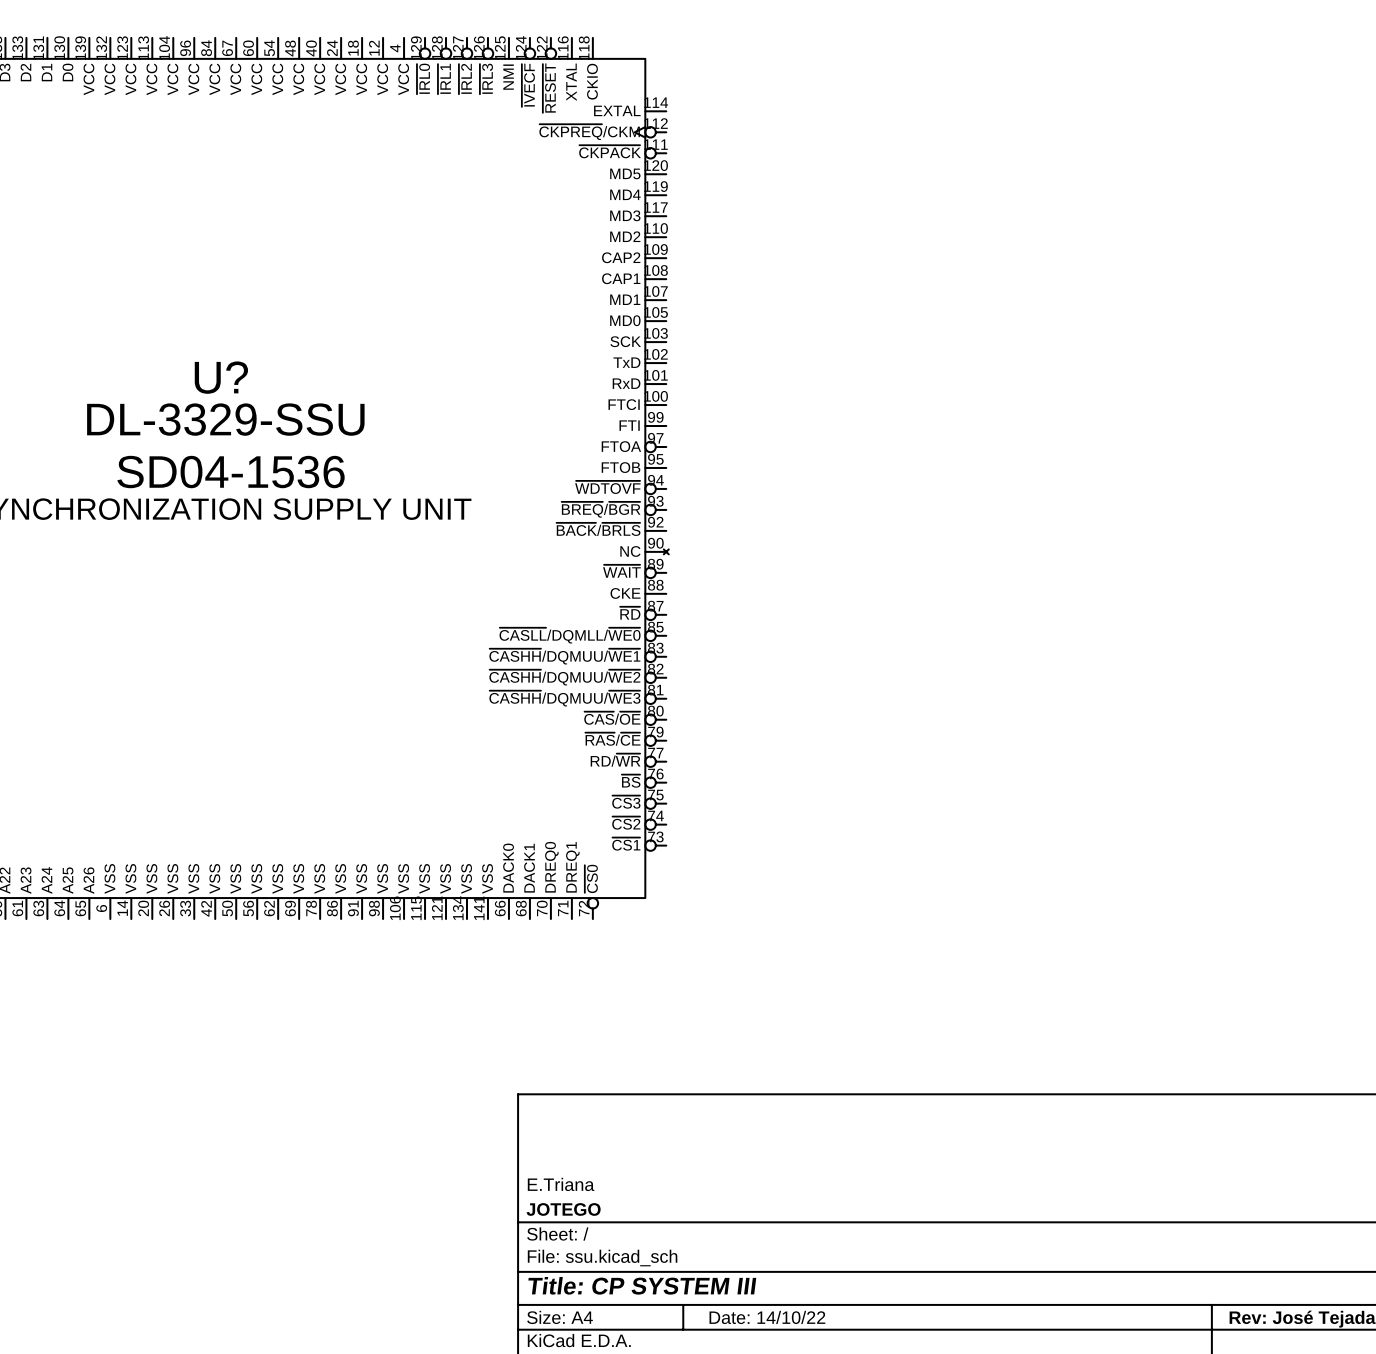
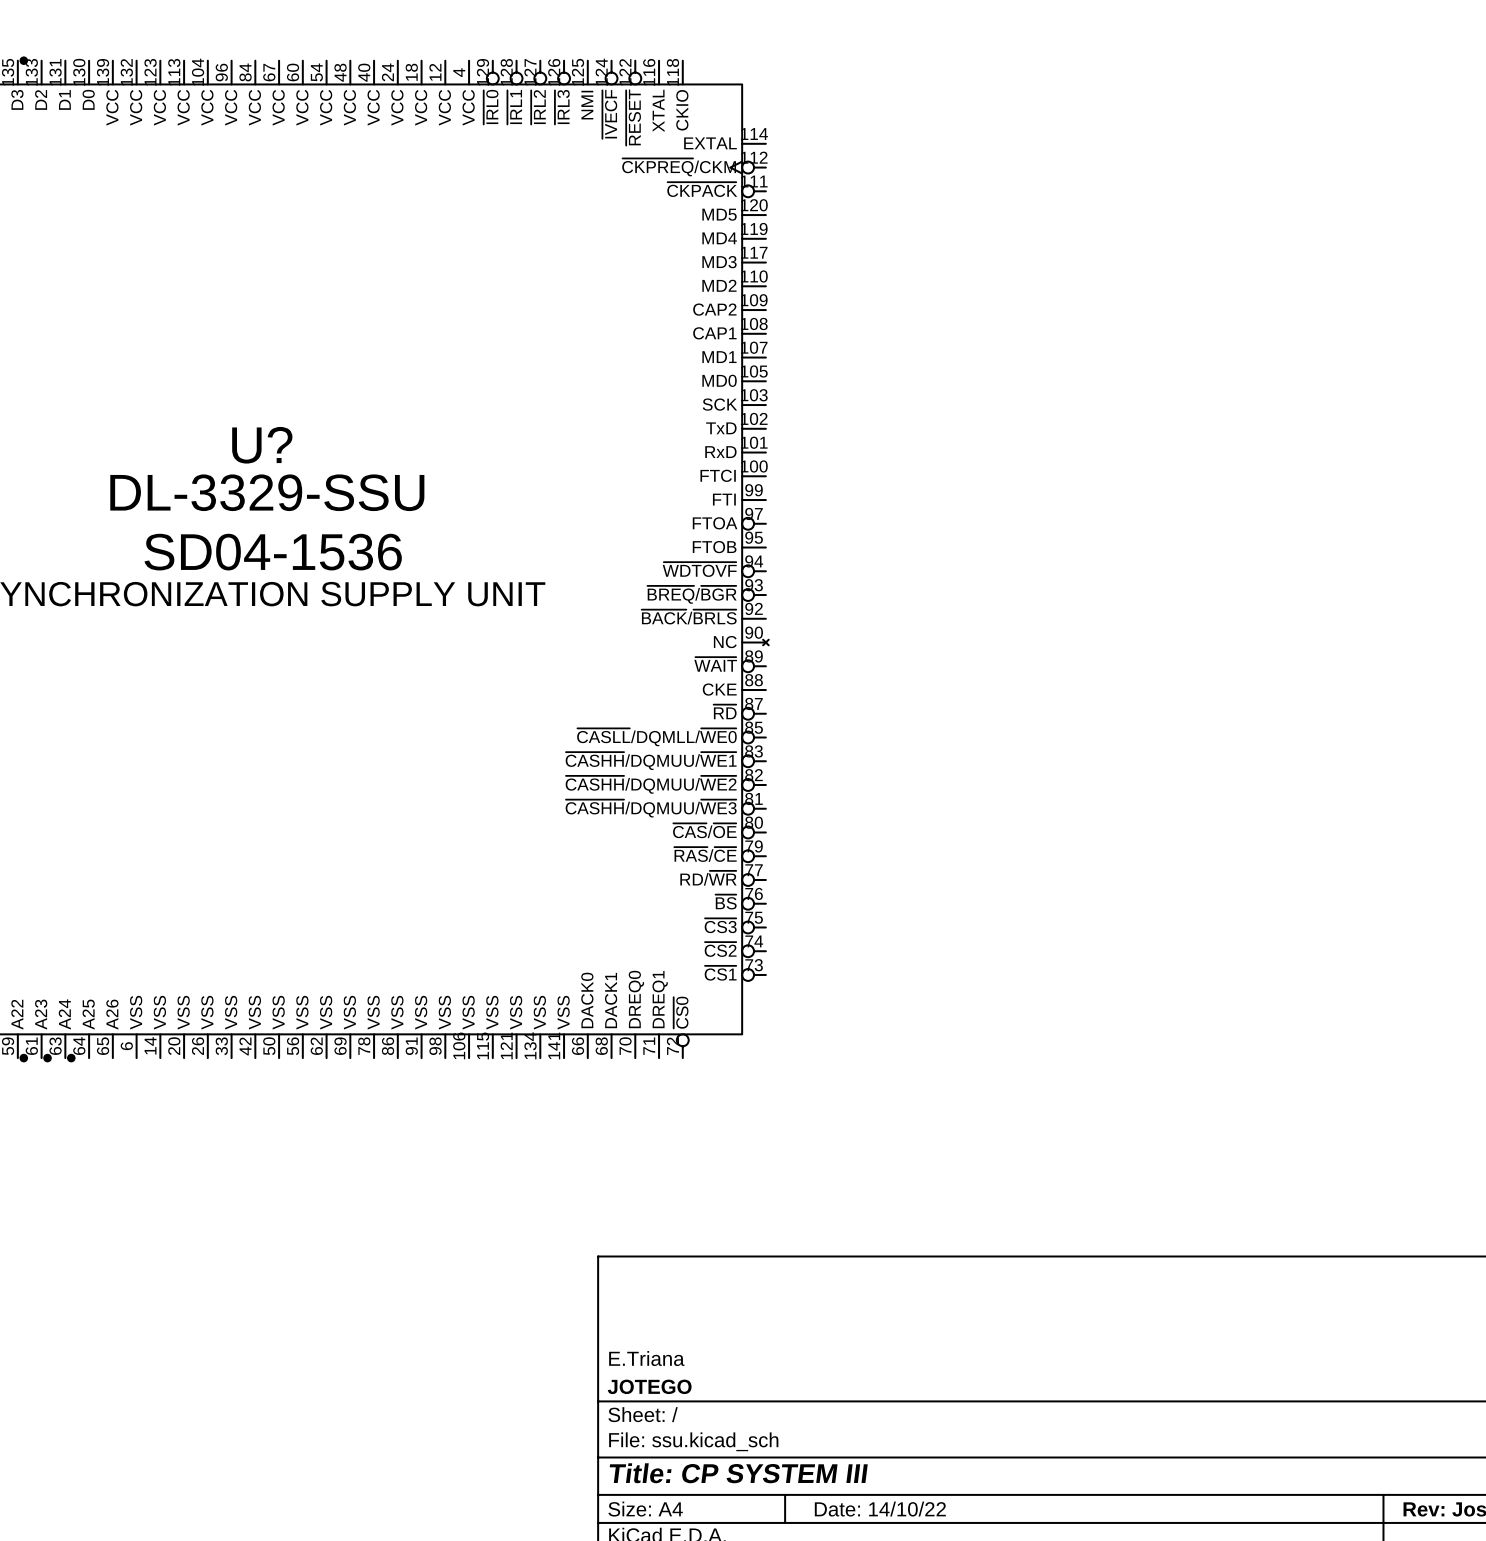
junction: none -> (23, 60)
junction: none -> (23, 1058)
junction: none -> (47, 1058)
junction: none -> (71, 1058)

